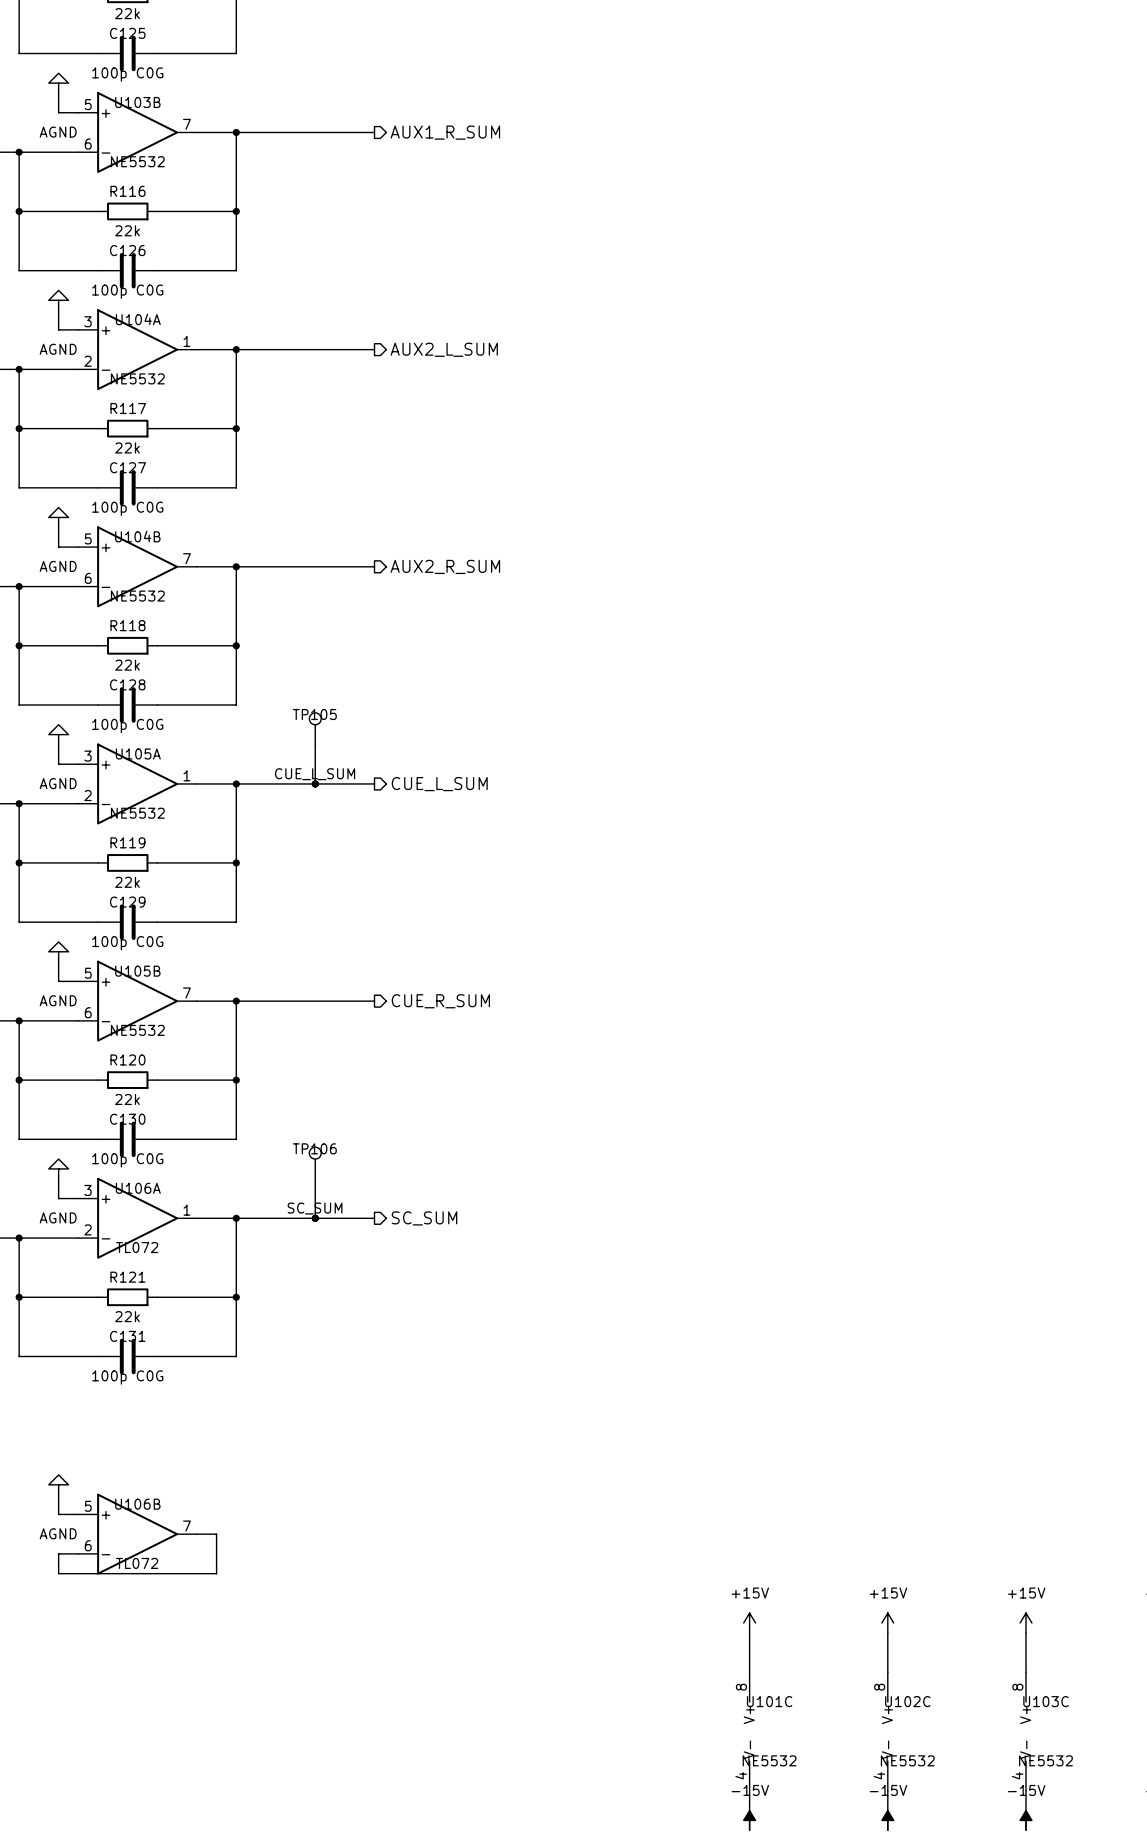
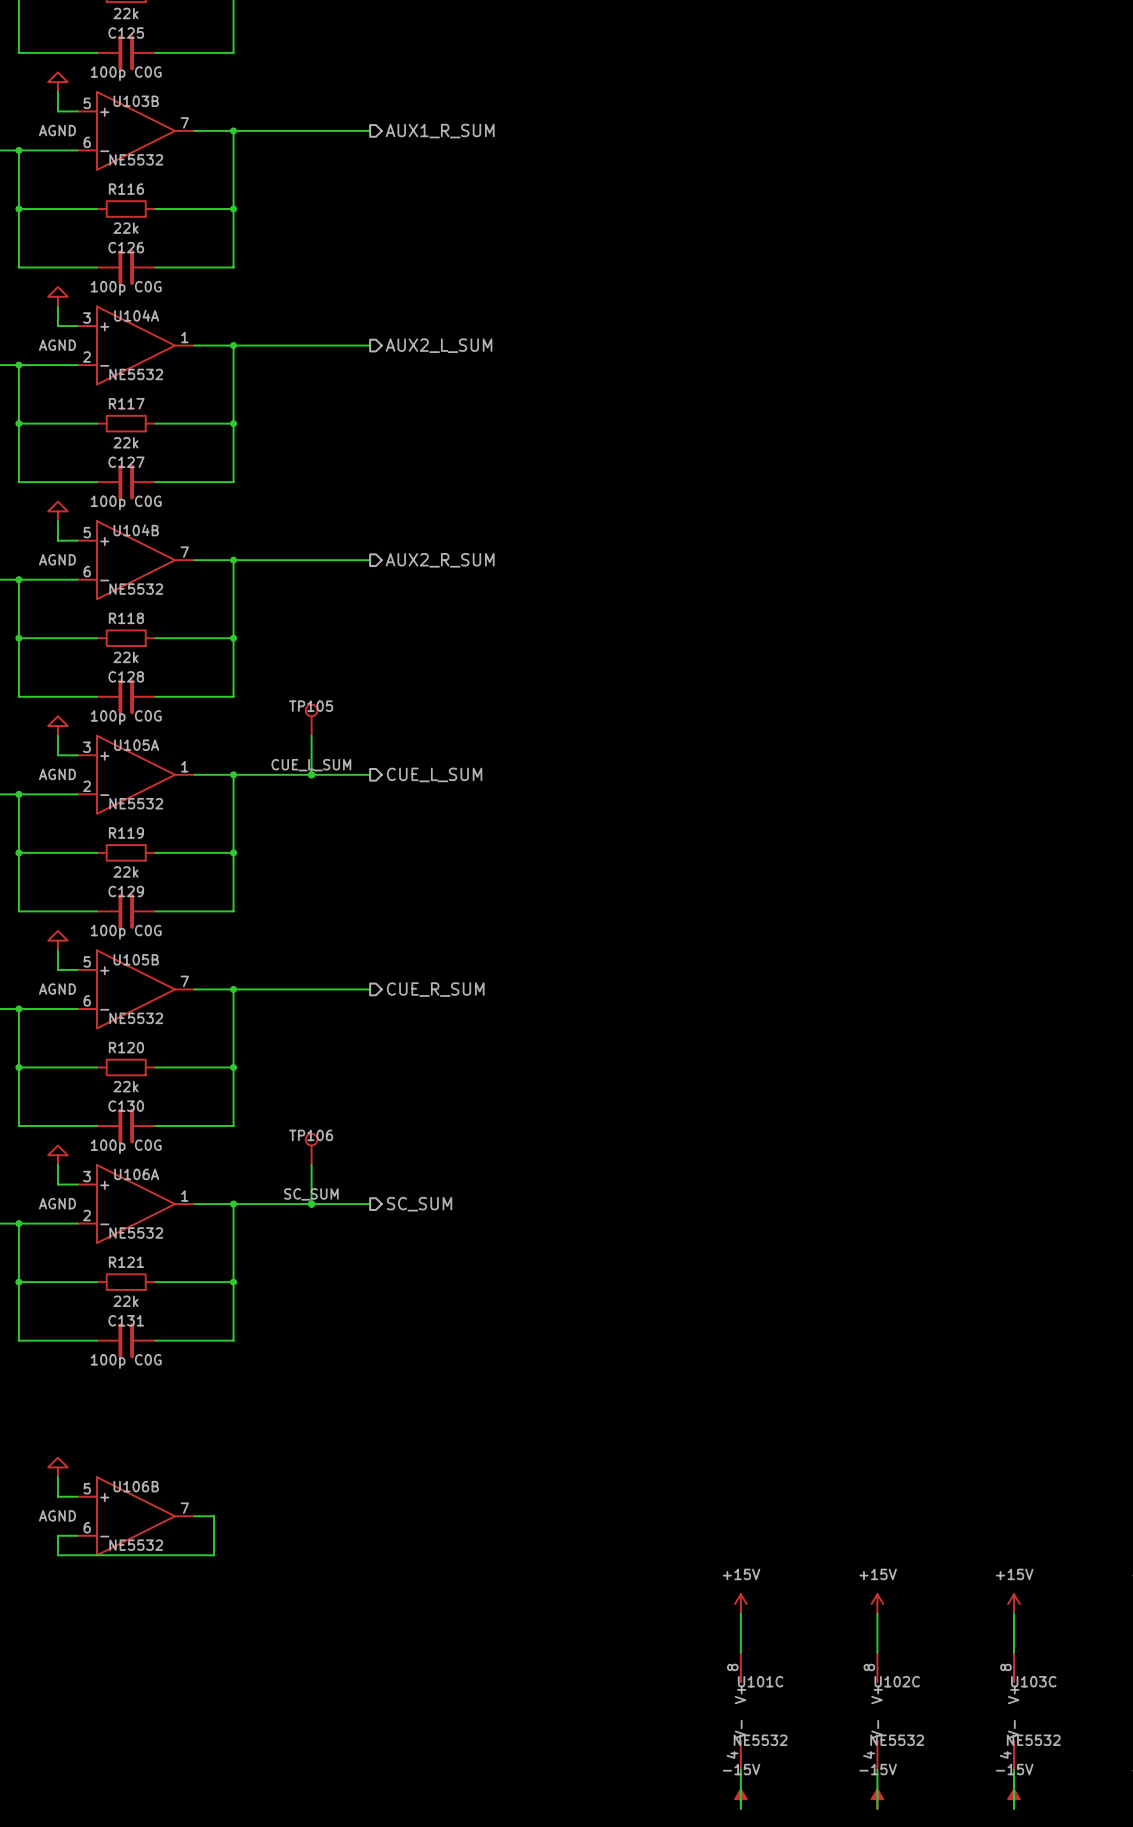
U106A value: TL072 (137, 1247) -> NE5532 (136, 1232)
U106B value: TL072 (137, 1563) -> NE5532 (136, 1545)

